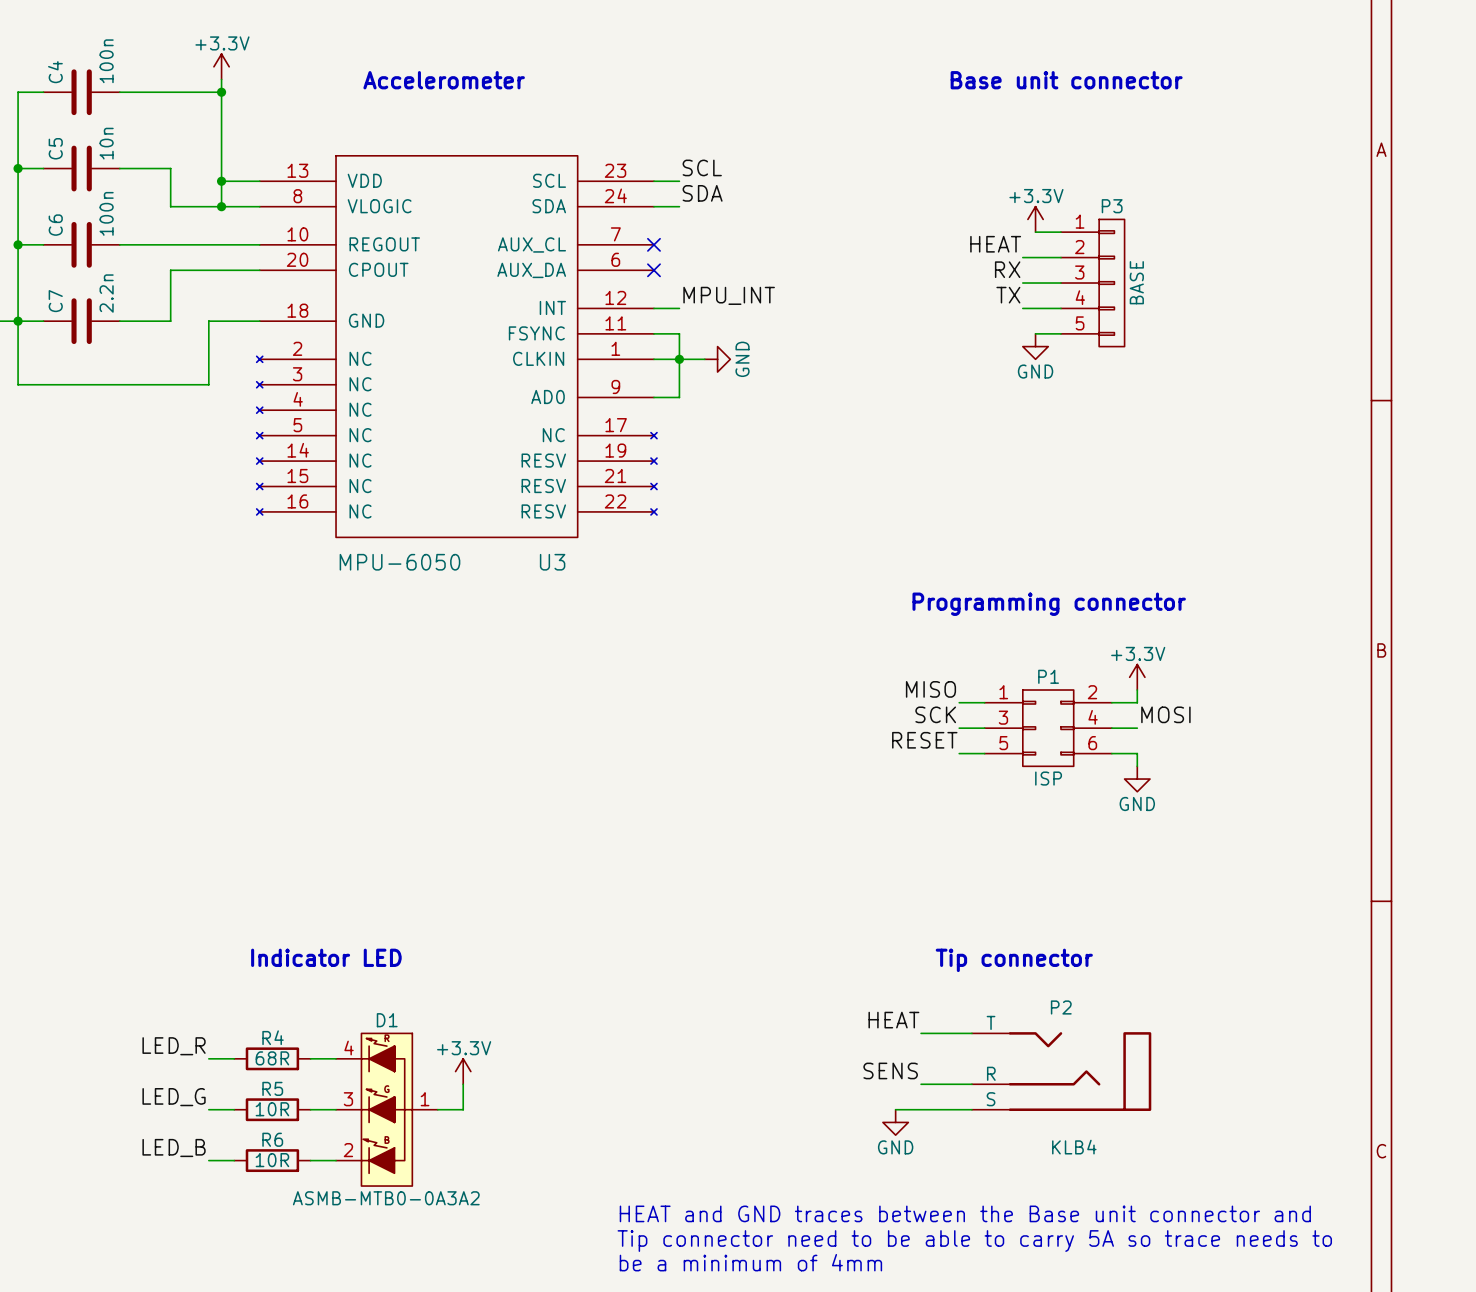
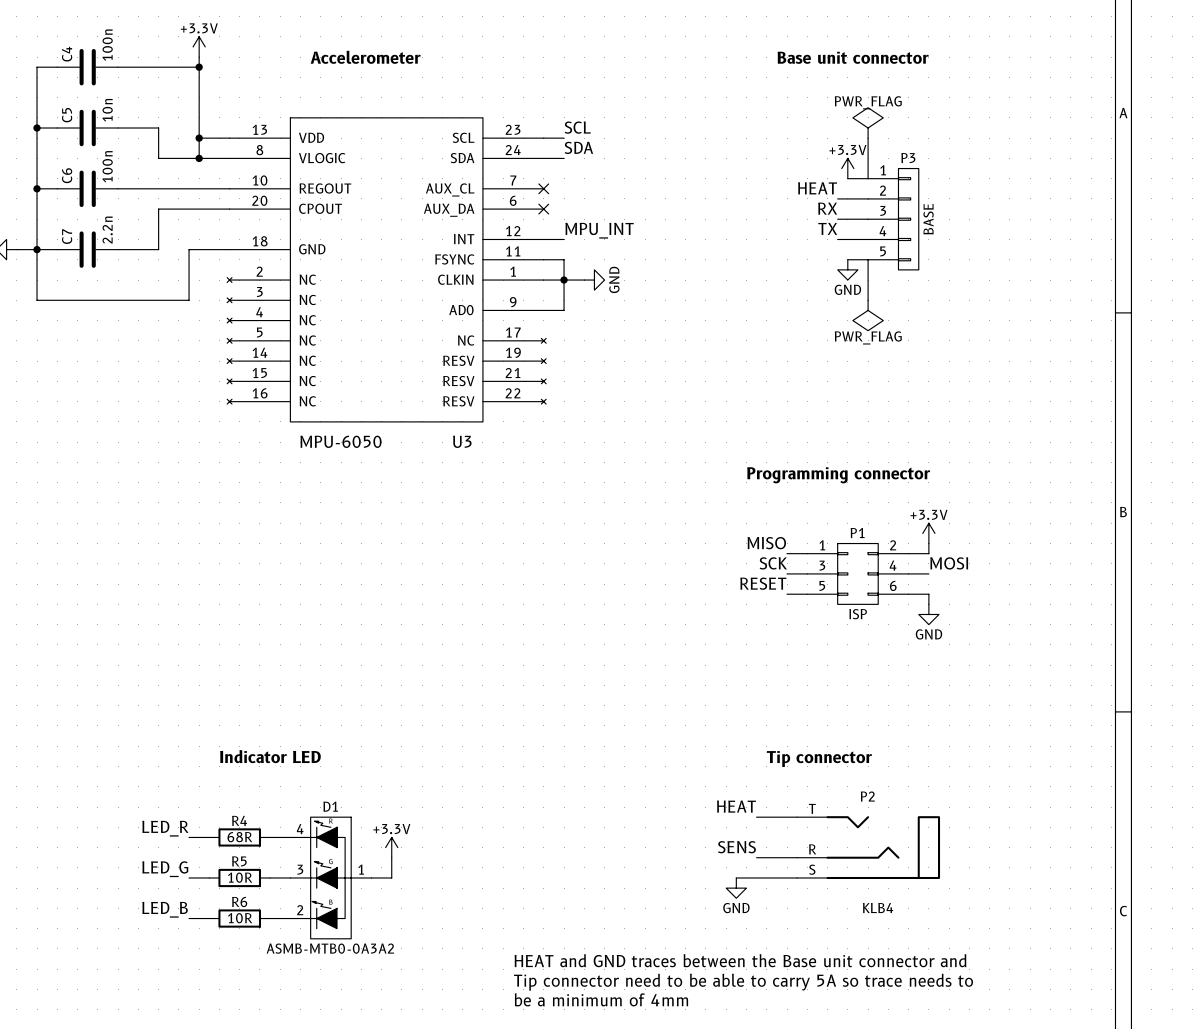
power symbol: none -> PWR_FLAG (868, 122)
wire: none -> (868, 138) (868, 178)
wire: none -> (868, 259) (868, 300)
power symbol: none -> PWR_FLAG (868, 315)

